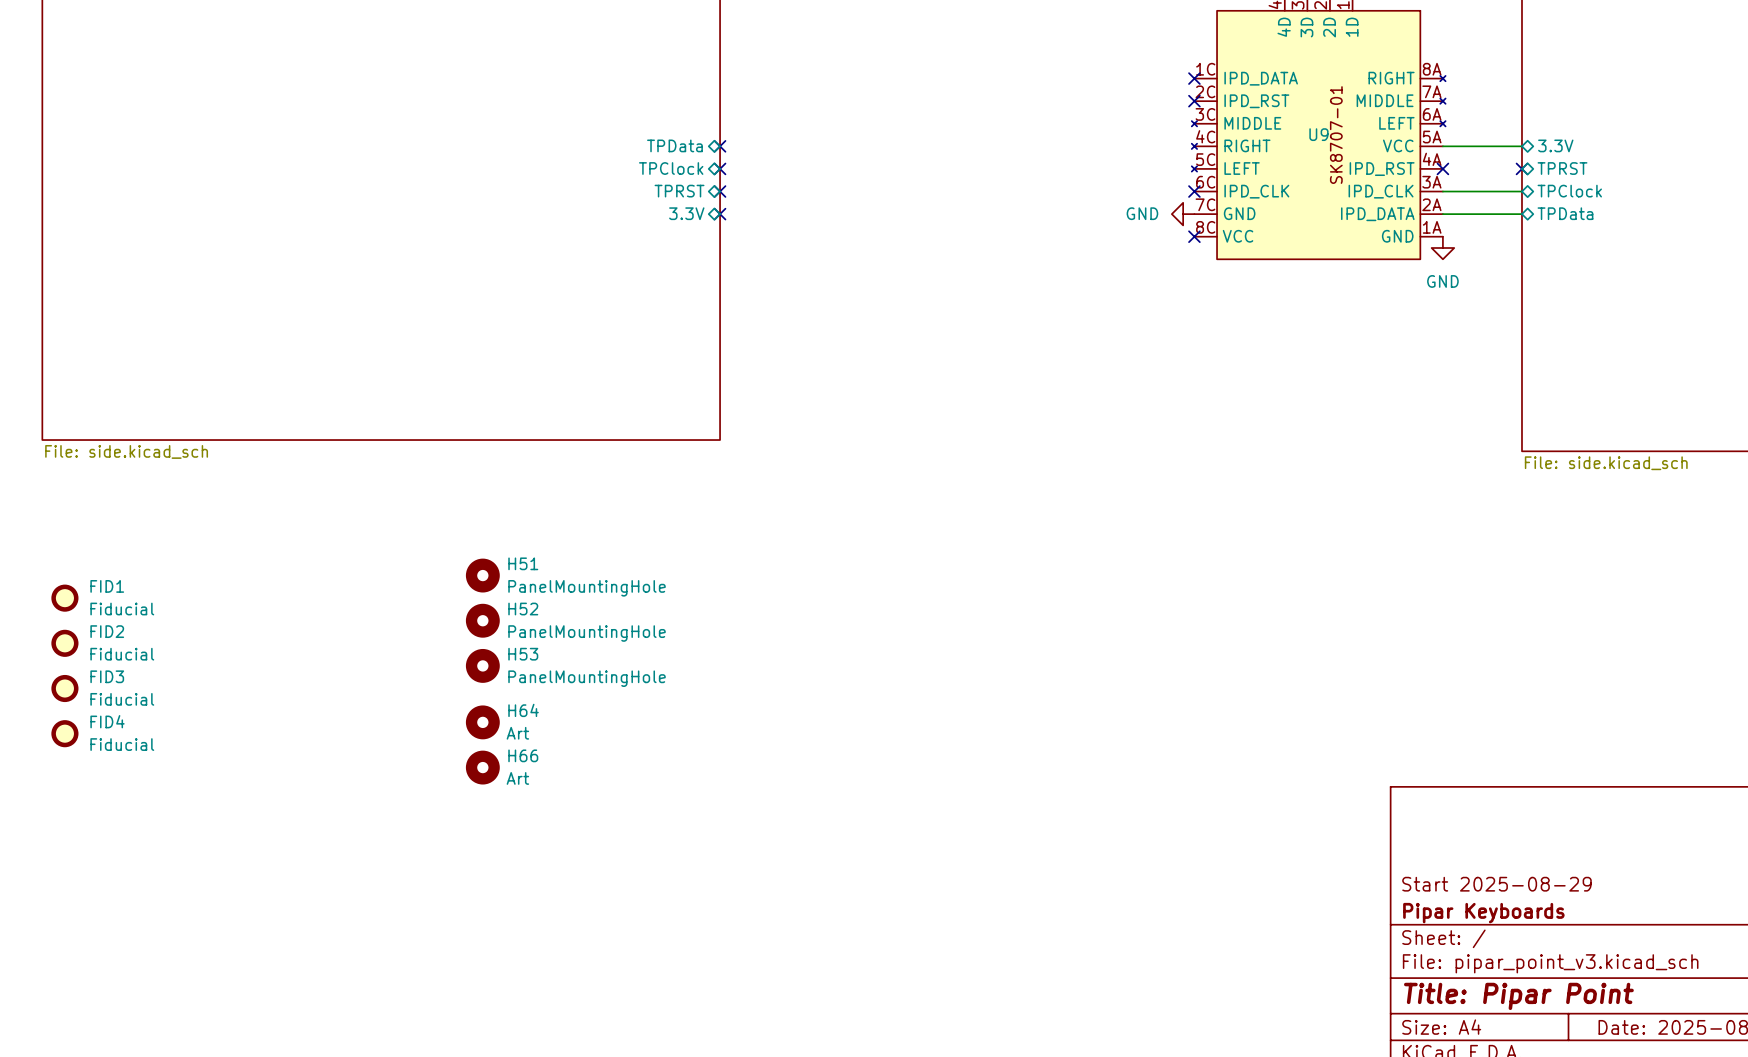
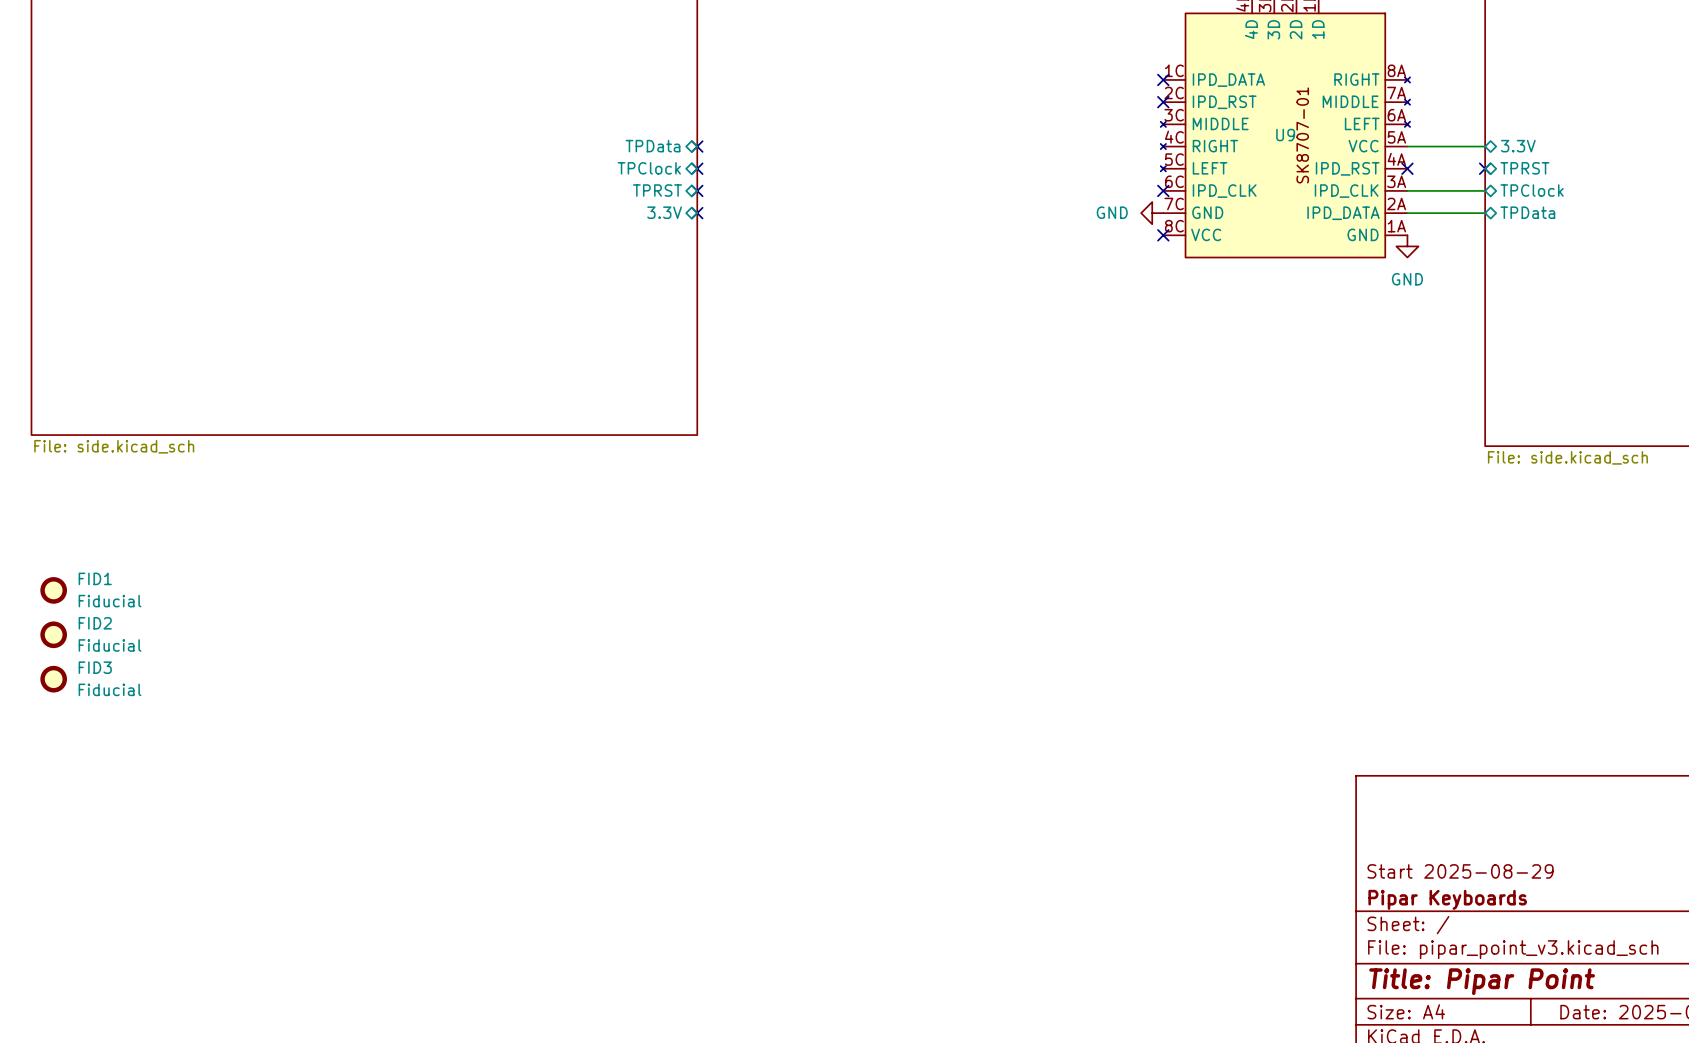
H51: PanelMountingHole (482, 575) -> none
H52: PanelMountingHole (482, 620) -> none
H53: PanelMountingHole (482, 665) -> none
H64: Art (482, 722) -> none
FID4: Fiducial (64, 733) -> none
H66: Art (482, 767) -> none

